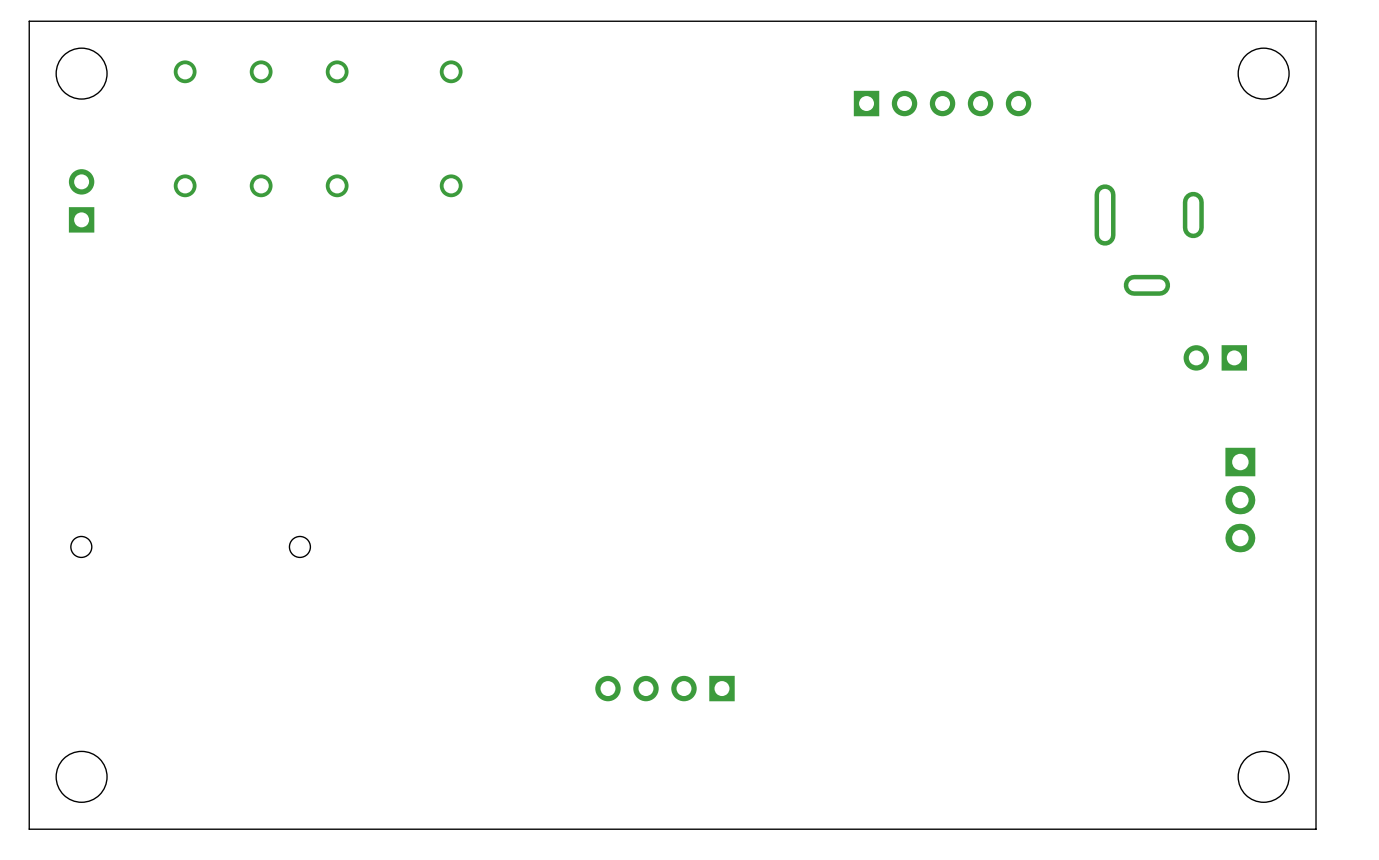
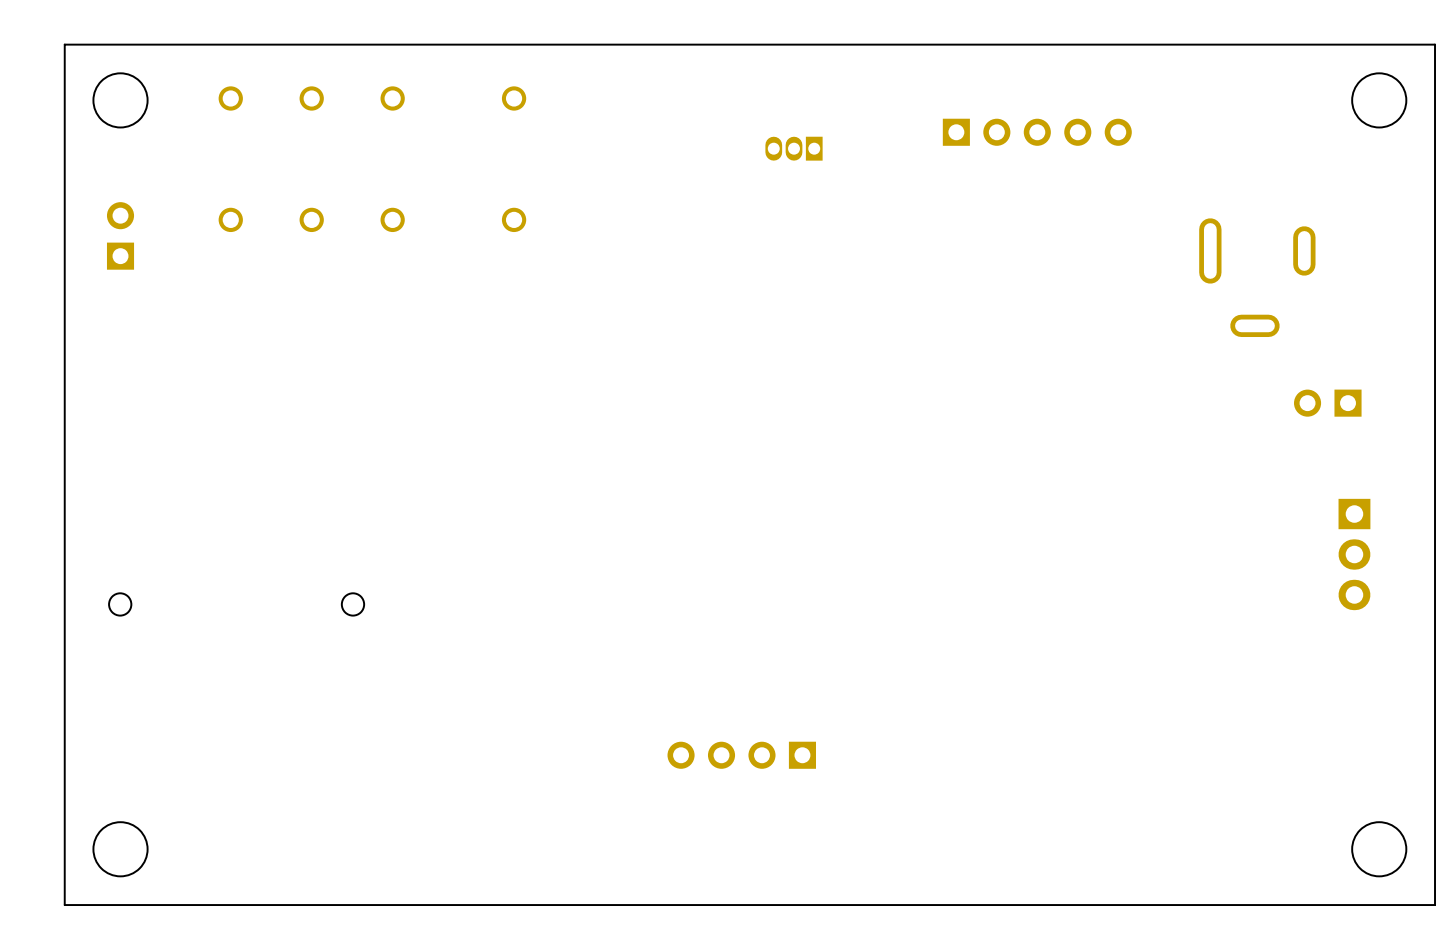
part: none -> (794, 148)

